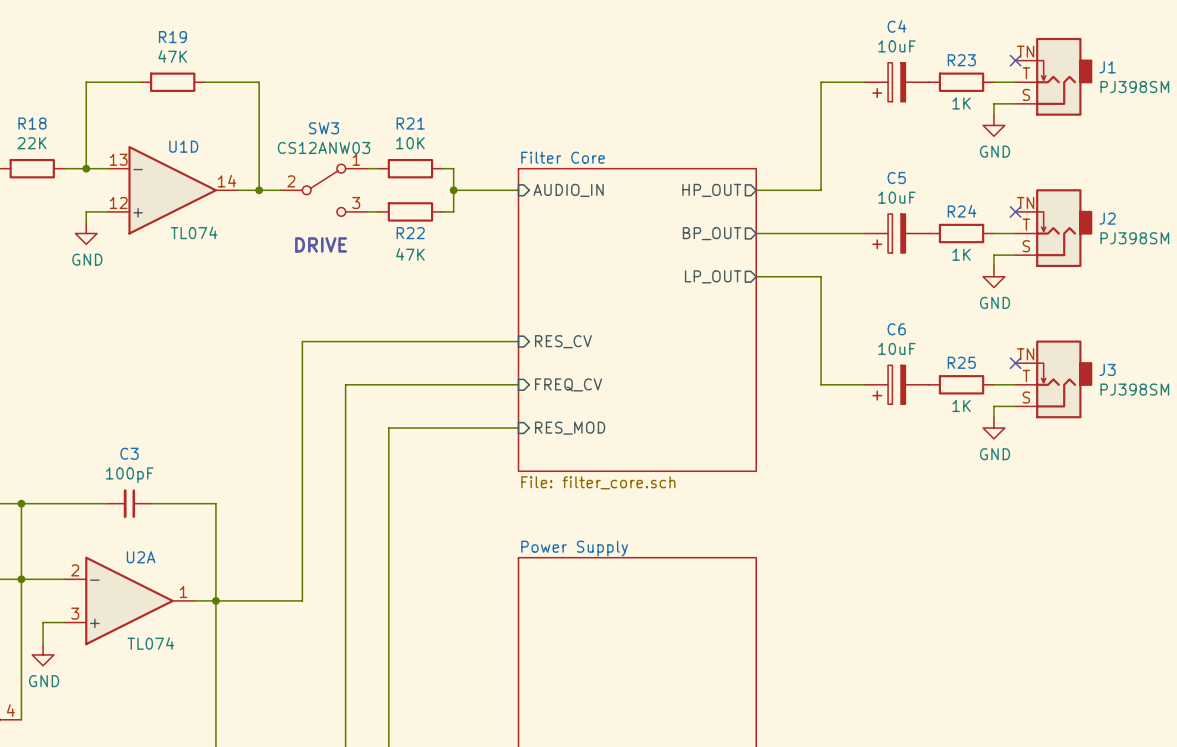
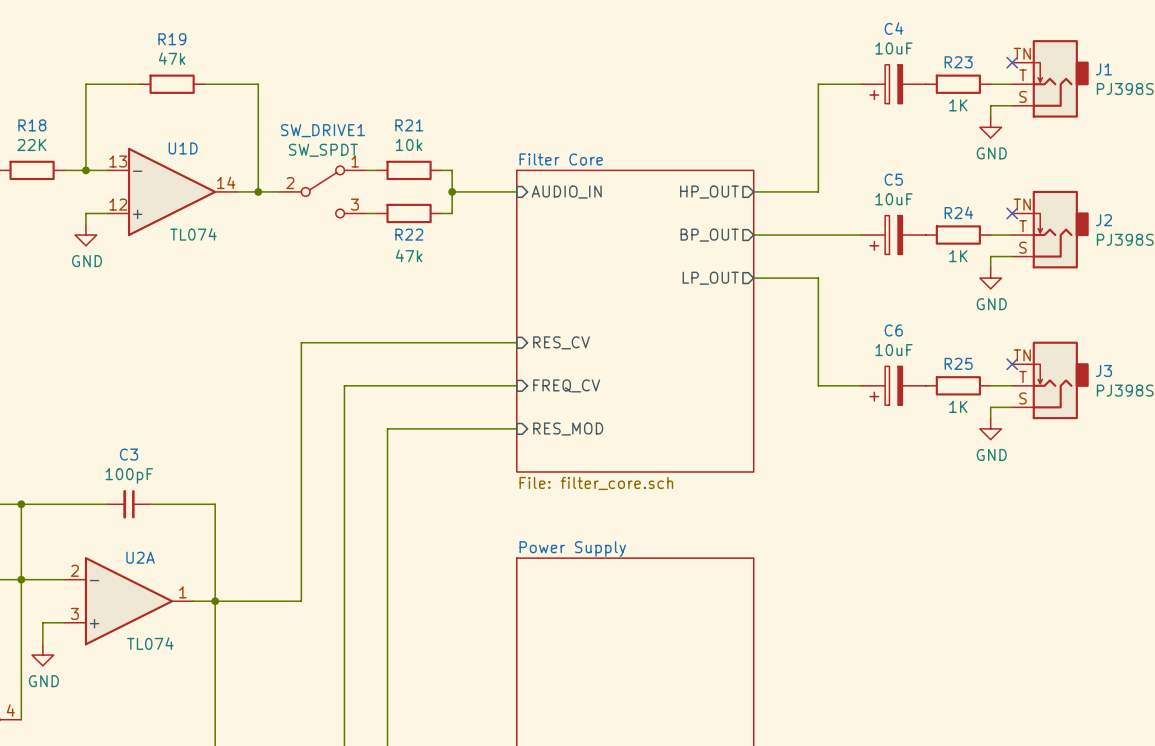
R19 value: 47K (172, 56) -> 47k (172, 58)
SW3 name: SW3 (323, 128) -> SW_DRIVE1 (322, 130)
R21 value: 10K (410, 143) -> 10k (409, 145)
SW3 value: CS12ANW03 (323, 147) -> SW_SPDT (323, 150)
text: DRIVE (321, 244) -> none
R22 value: 47K (410, 254) -> 47k (409, 255)

